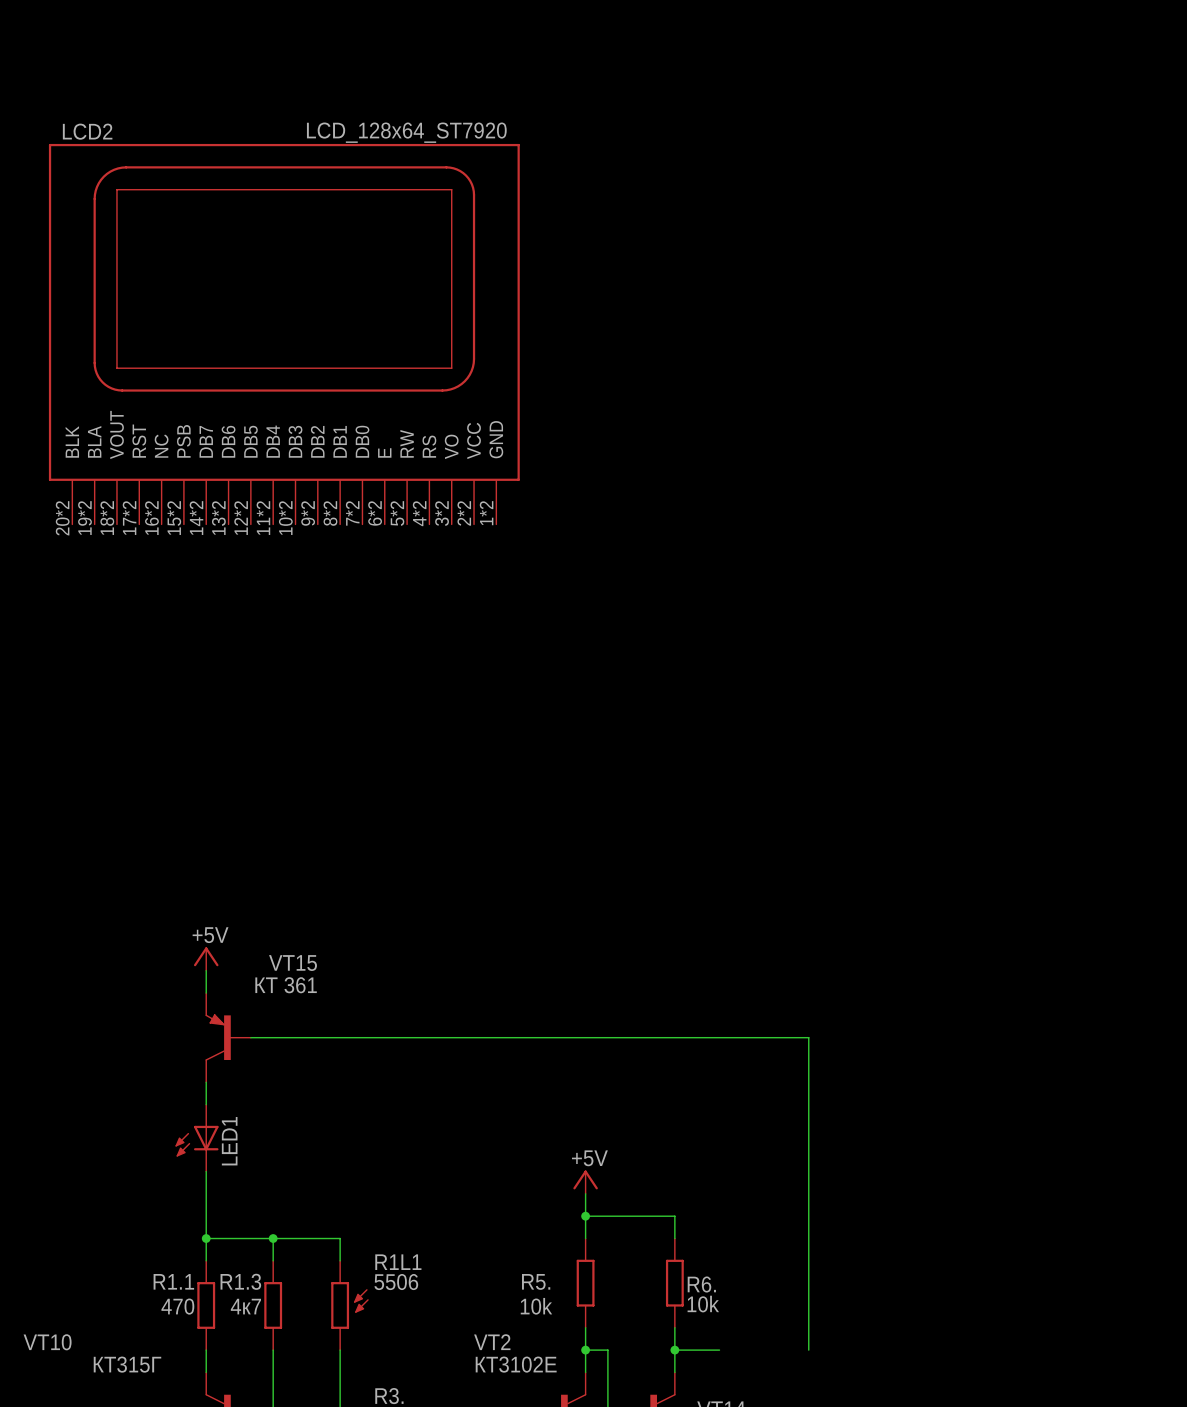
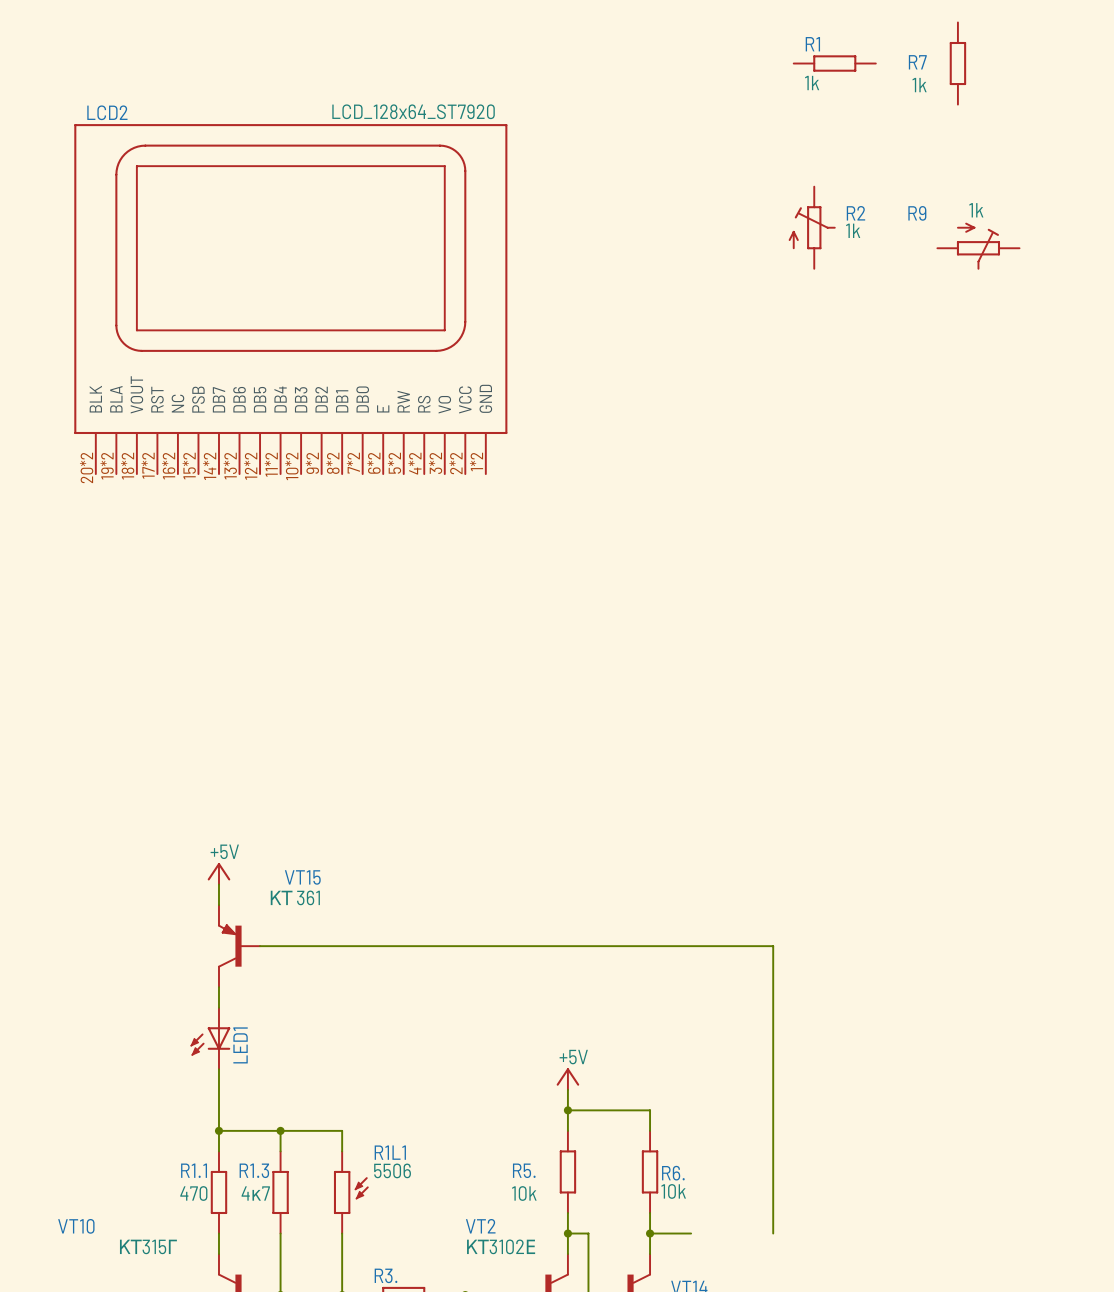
R1: none -> 1k (834, 63)
R7: none -> 1k (957, 63)
R2: none -> 1k (812, 227)
R9: none -> 1k (978, 246)

